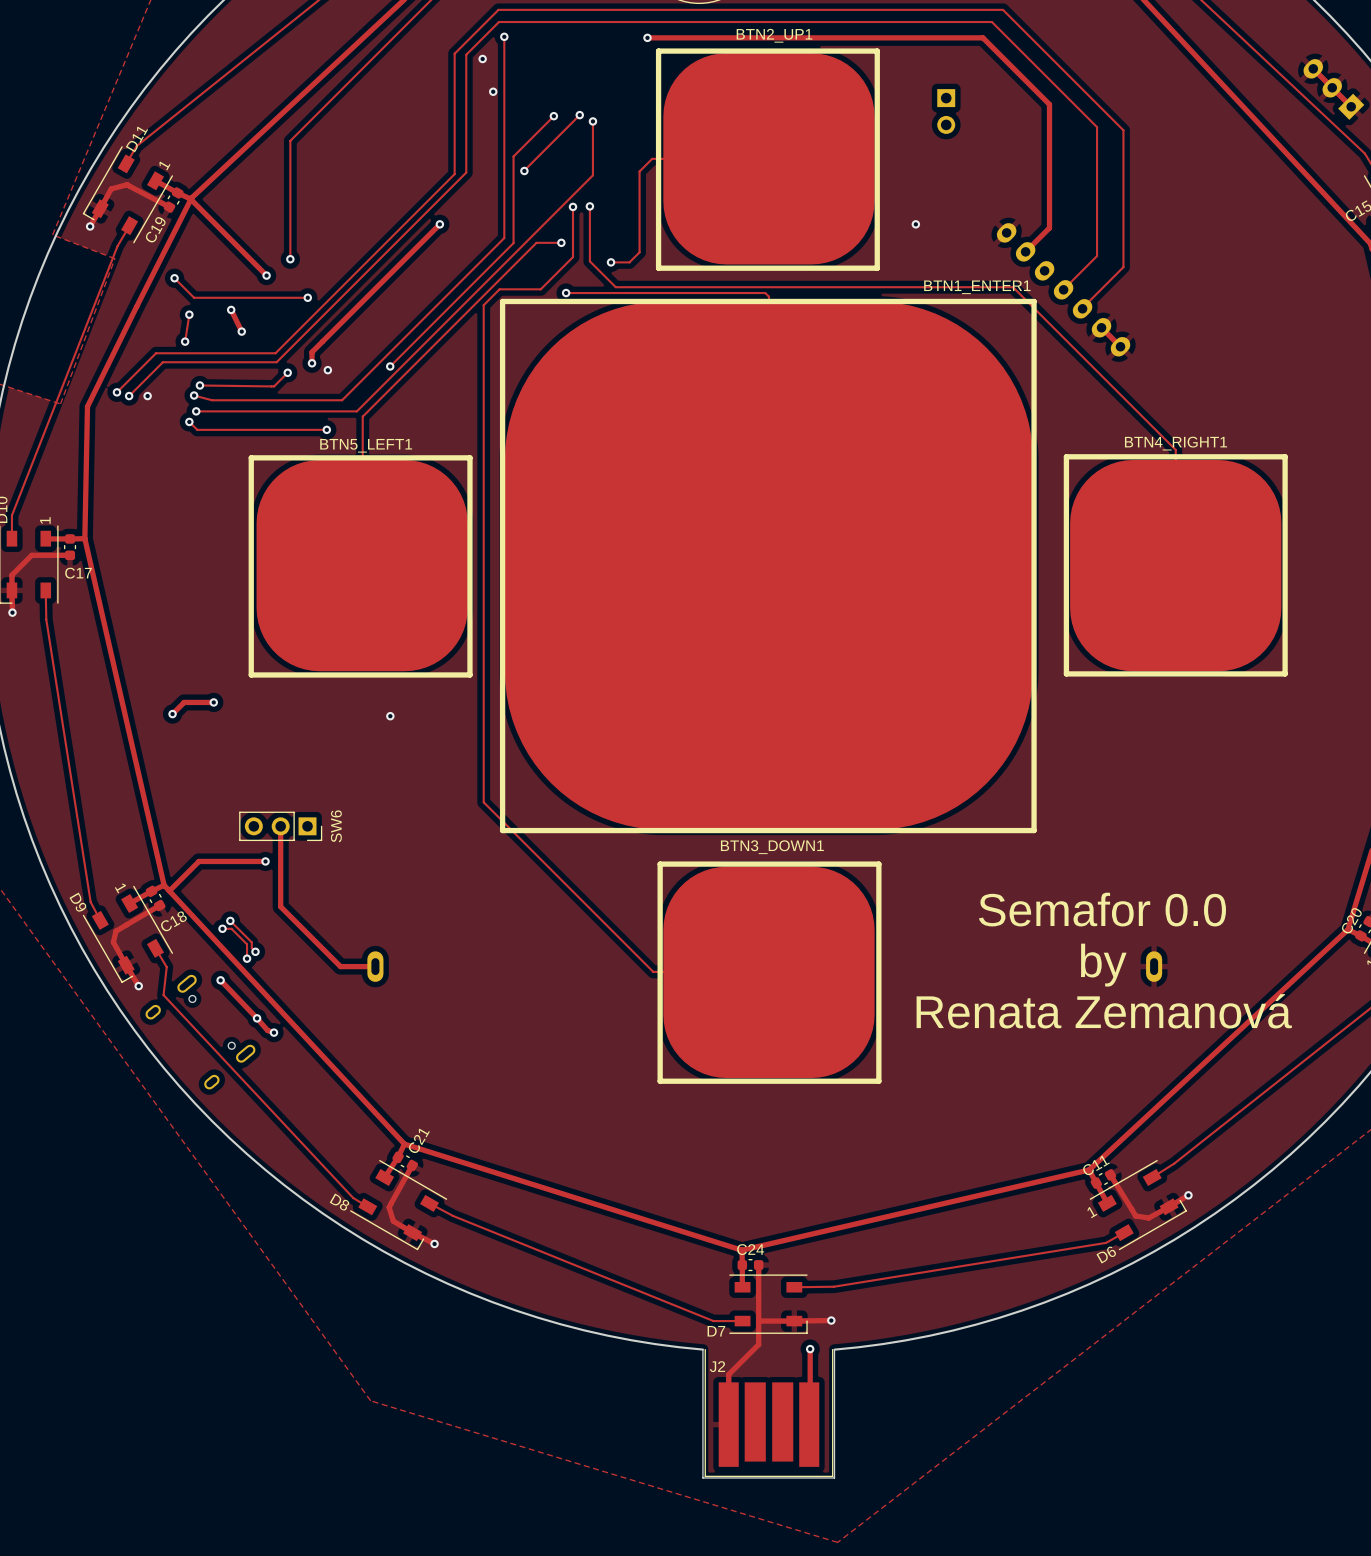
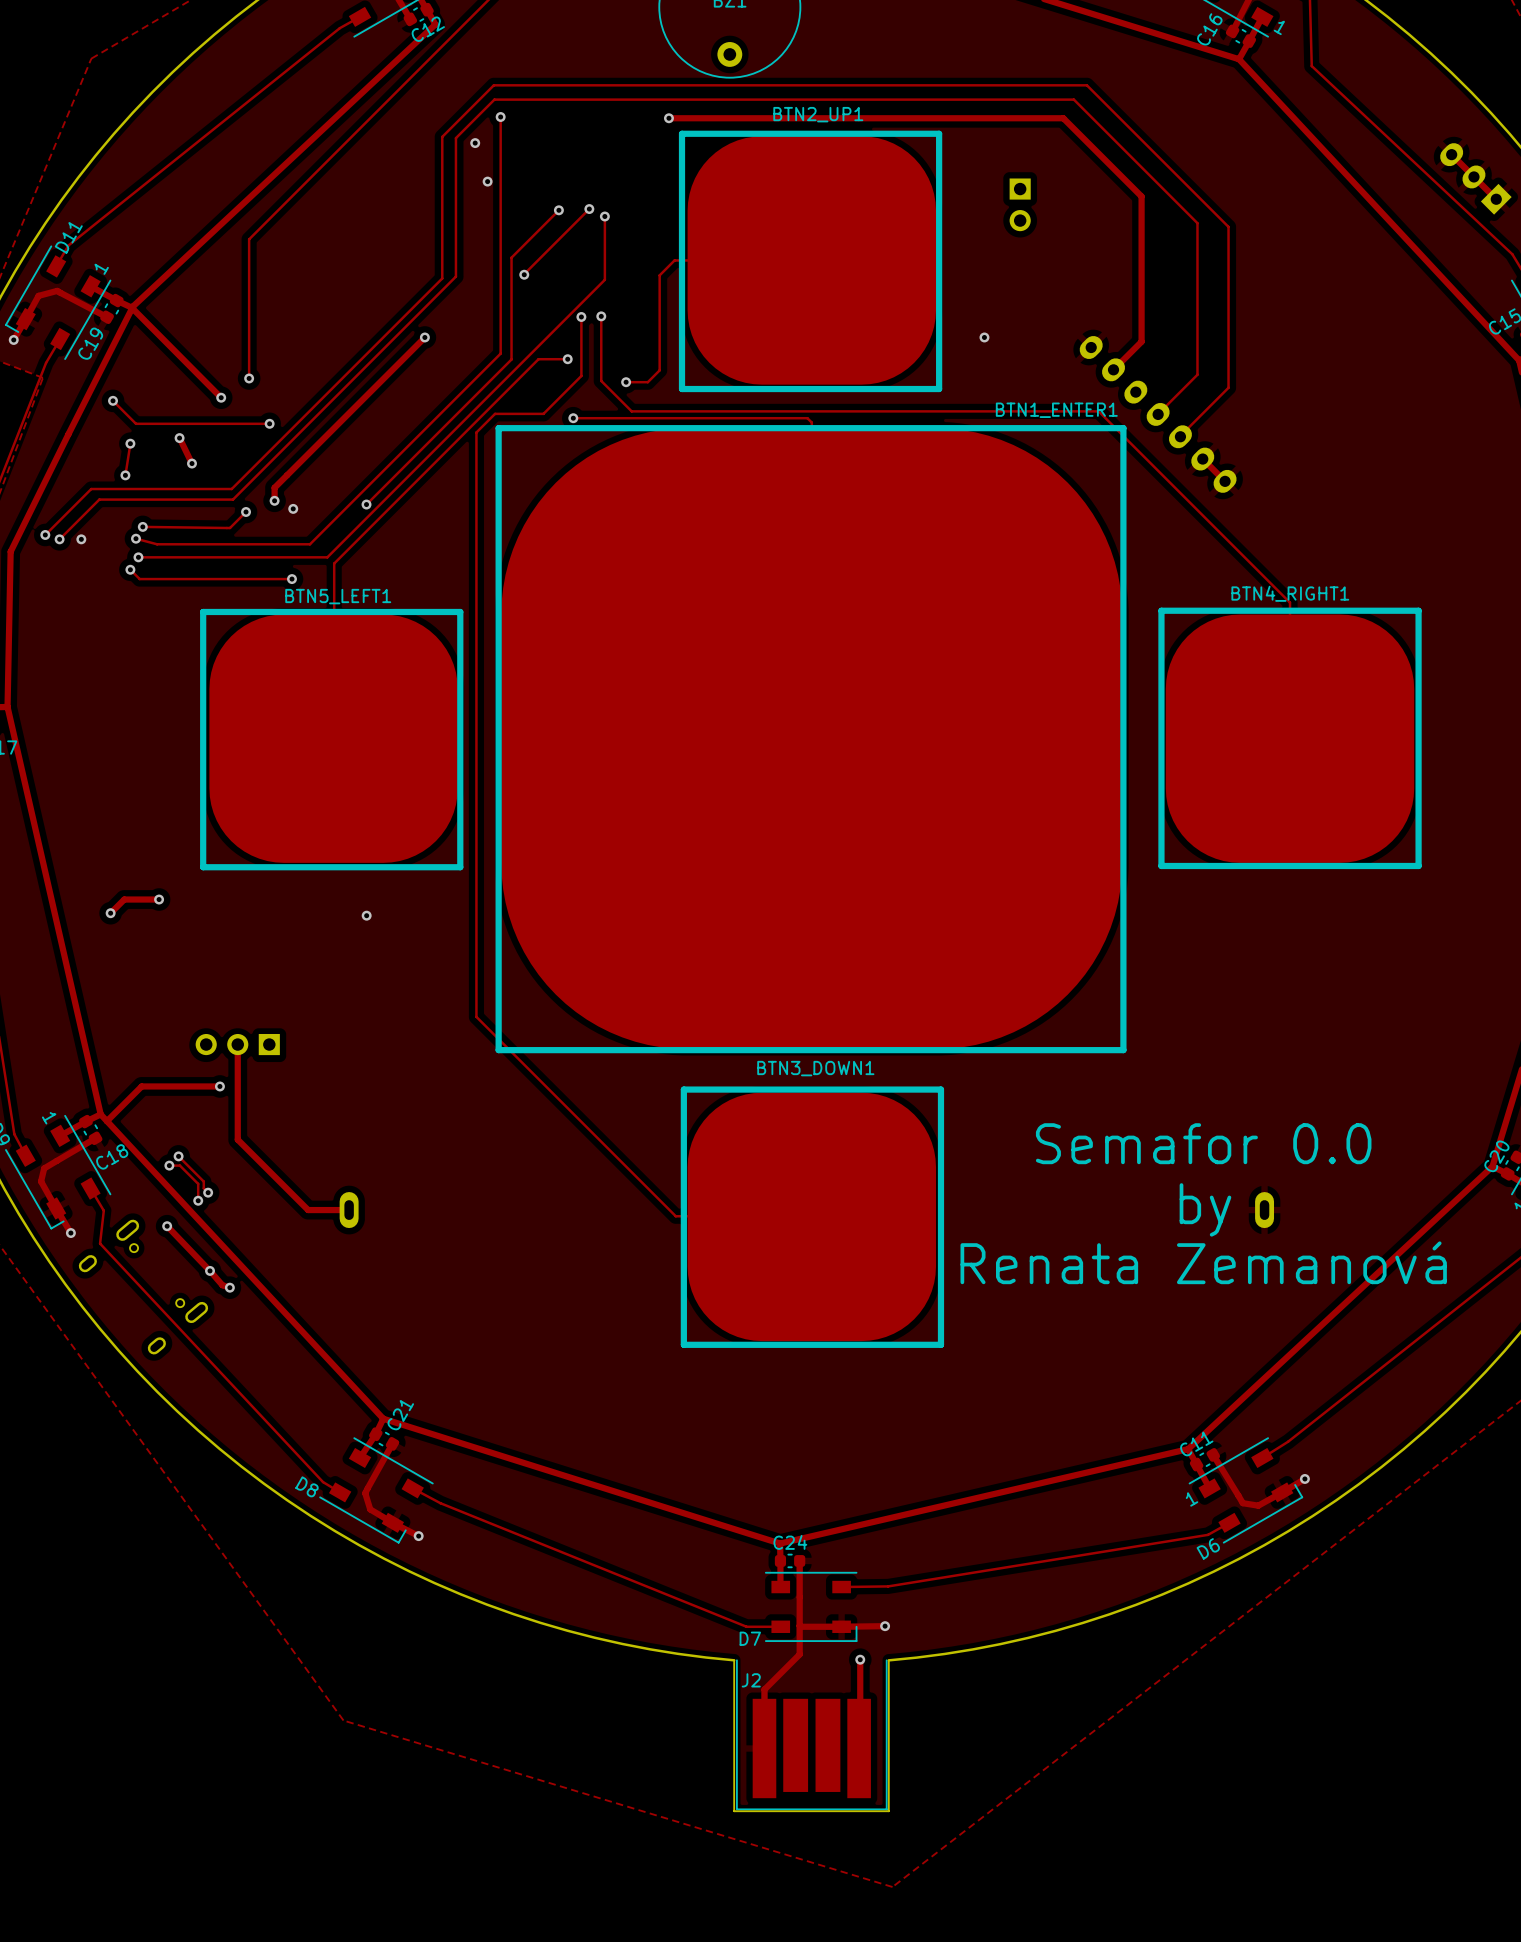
SW6 side: top (280, 826) -> bottom (237, 1044)

